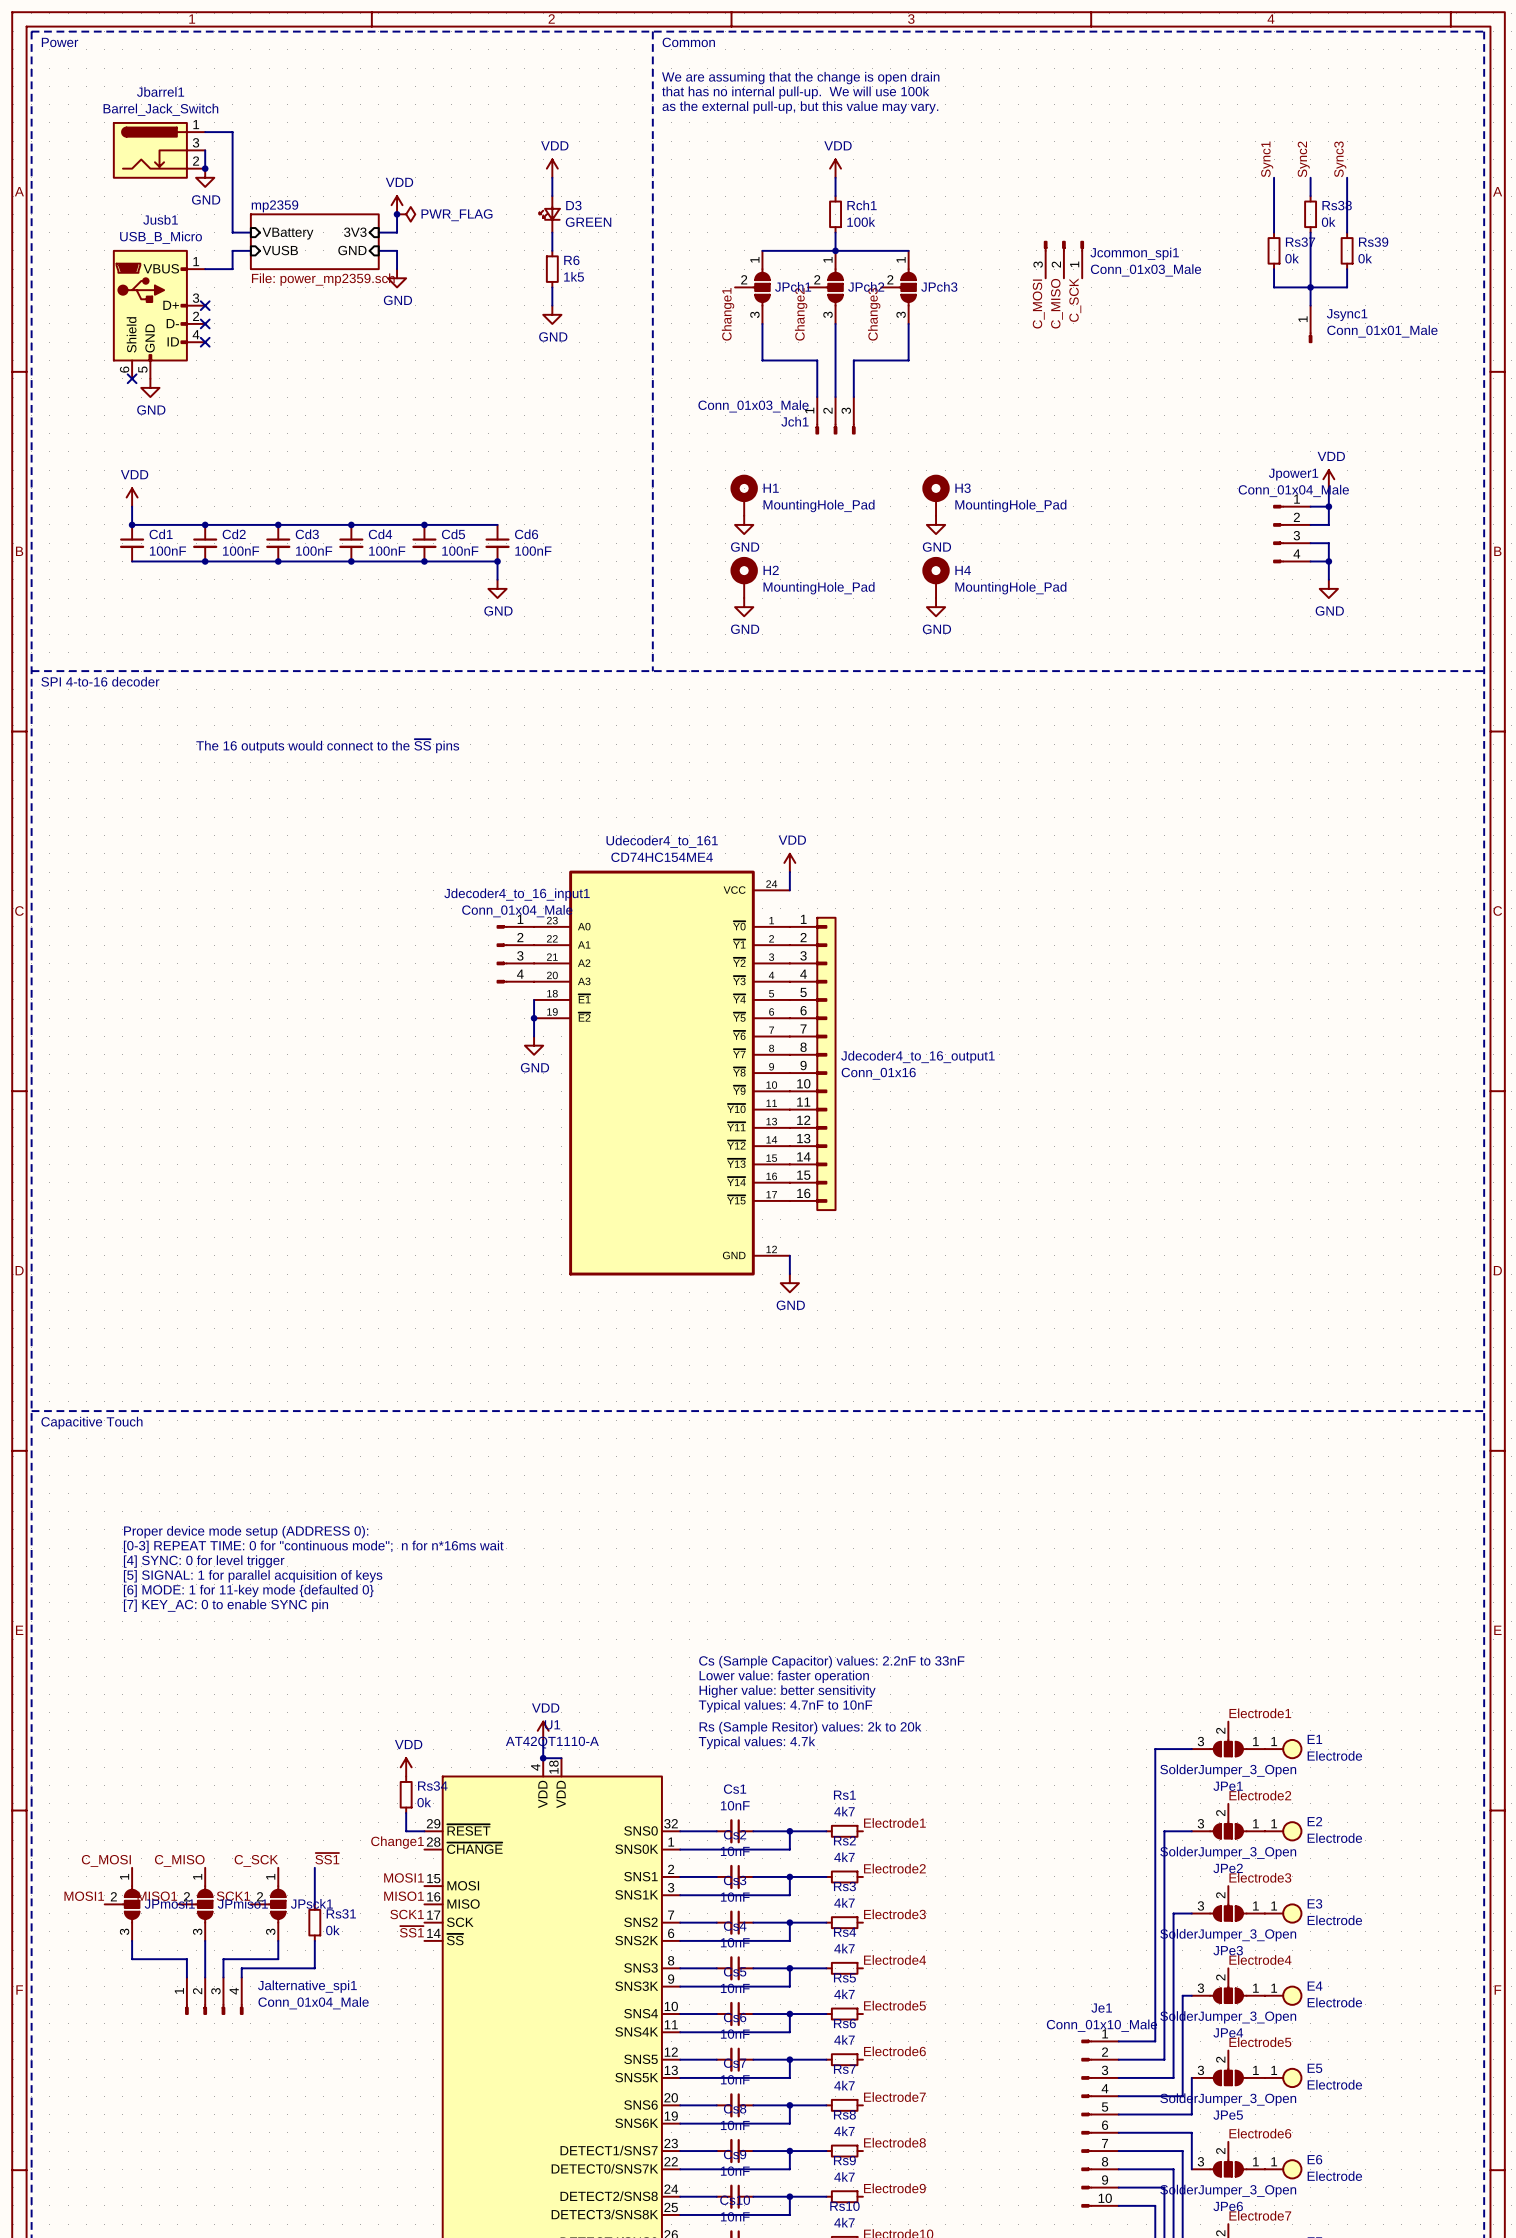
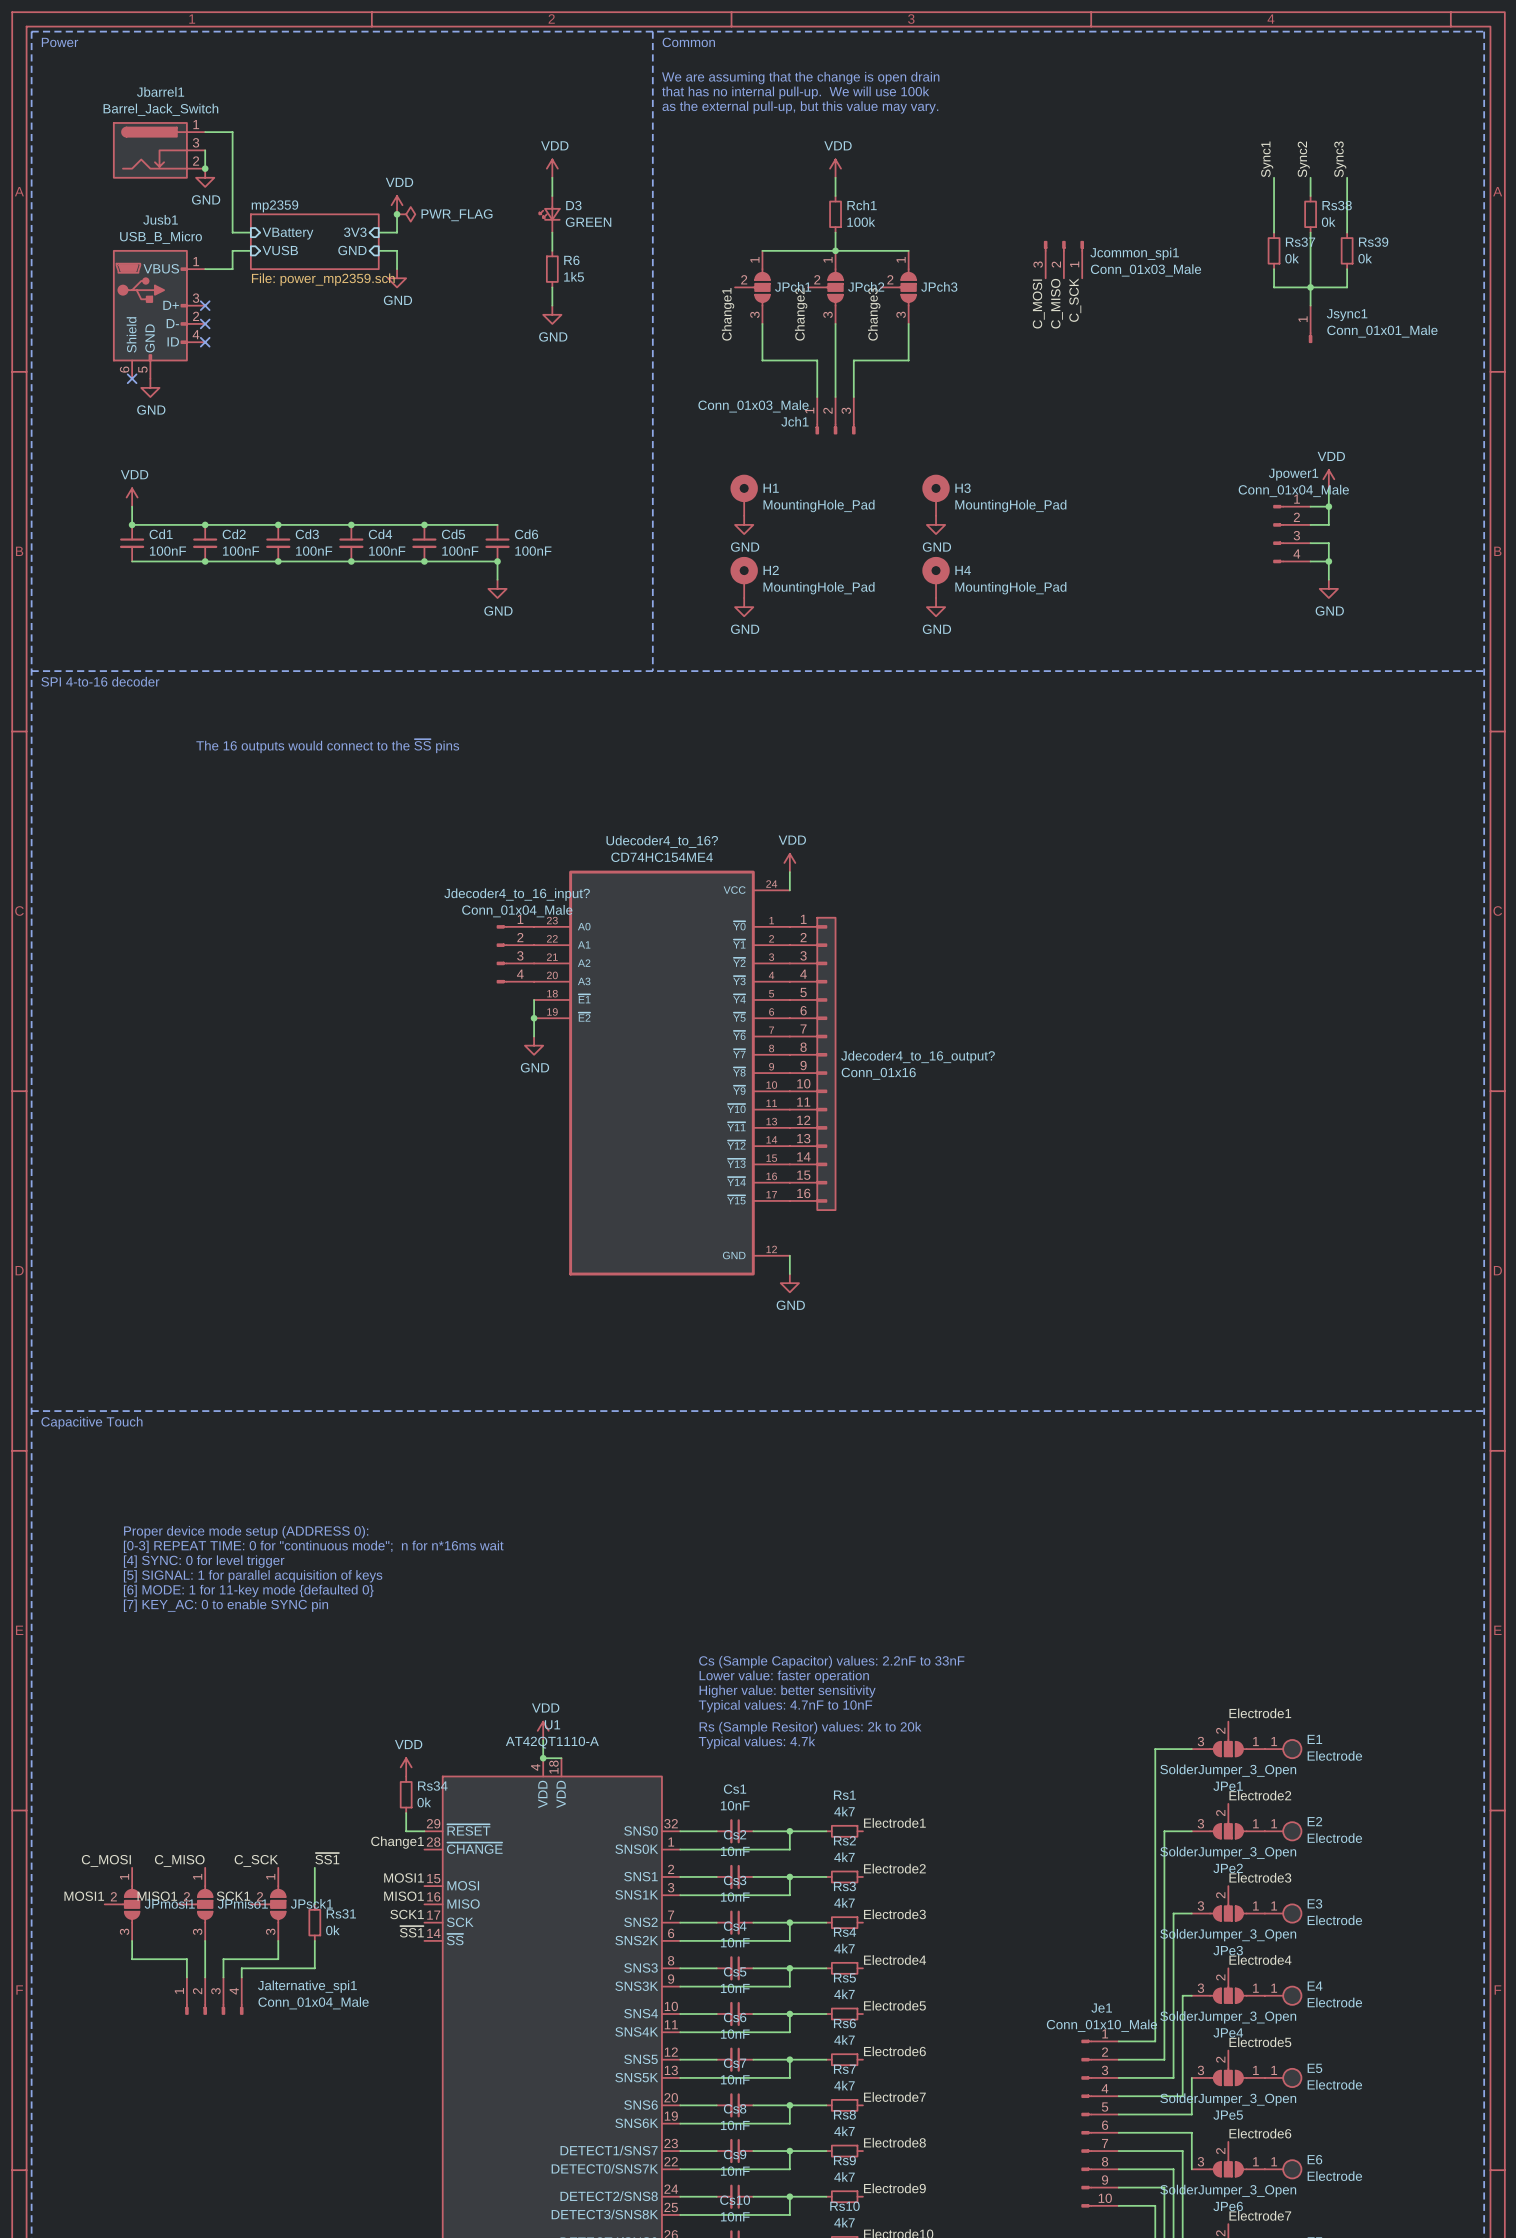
Udecoder4_to_161 name: Udecoder4_to_161 (662, 841) -> Udecoder4_to_16? (662, 841)
Jdecoder4_to_16_input1 name: Jdecoder4_to_16_input1 (517, 894) -> Jdecoder4_to_16_input? (517, 894)
Jdecoder4_to_16_output1 name: Jdecoder4_to_16_output1 (917, 1057) -> Jdecoder4_to_16_output? (918, 1057)

